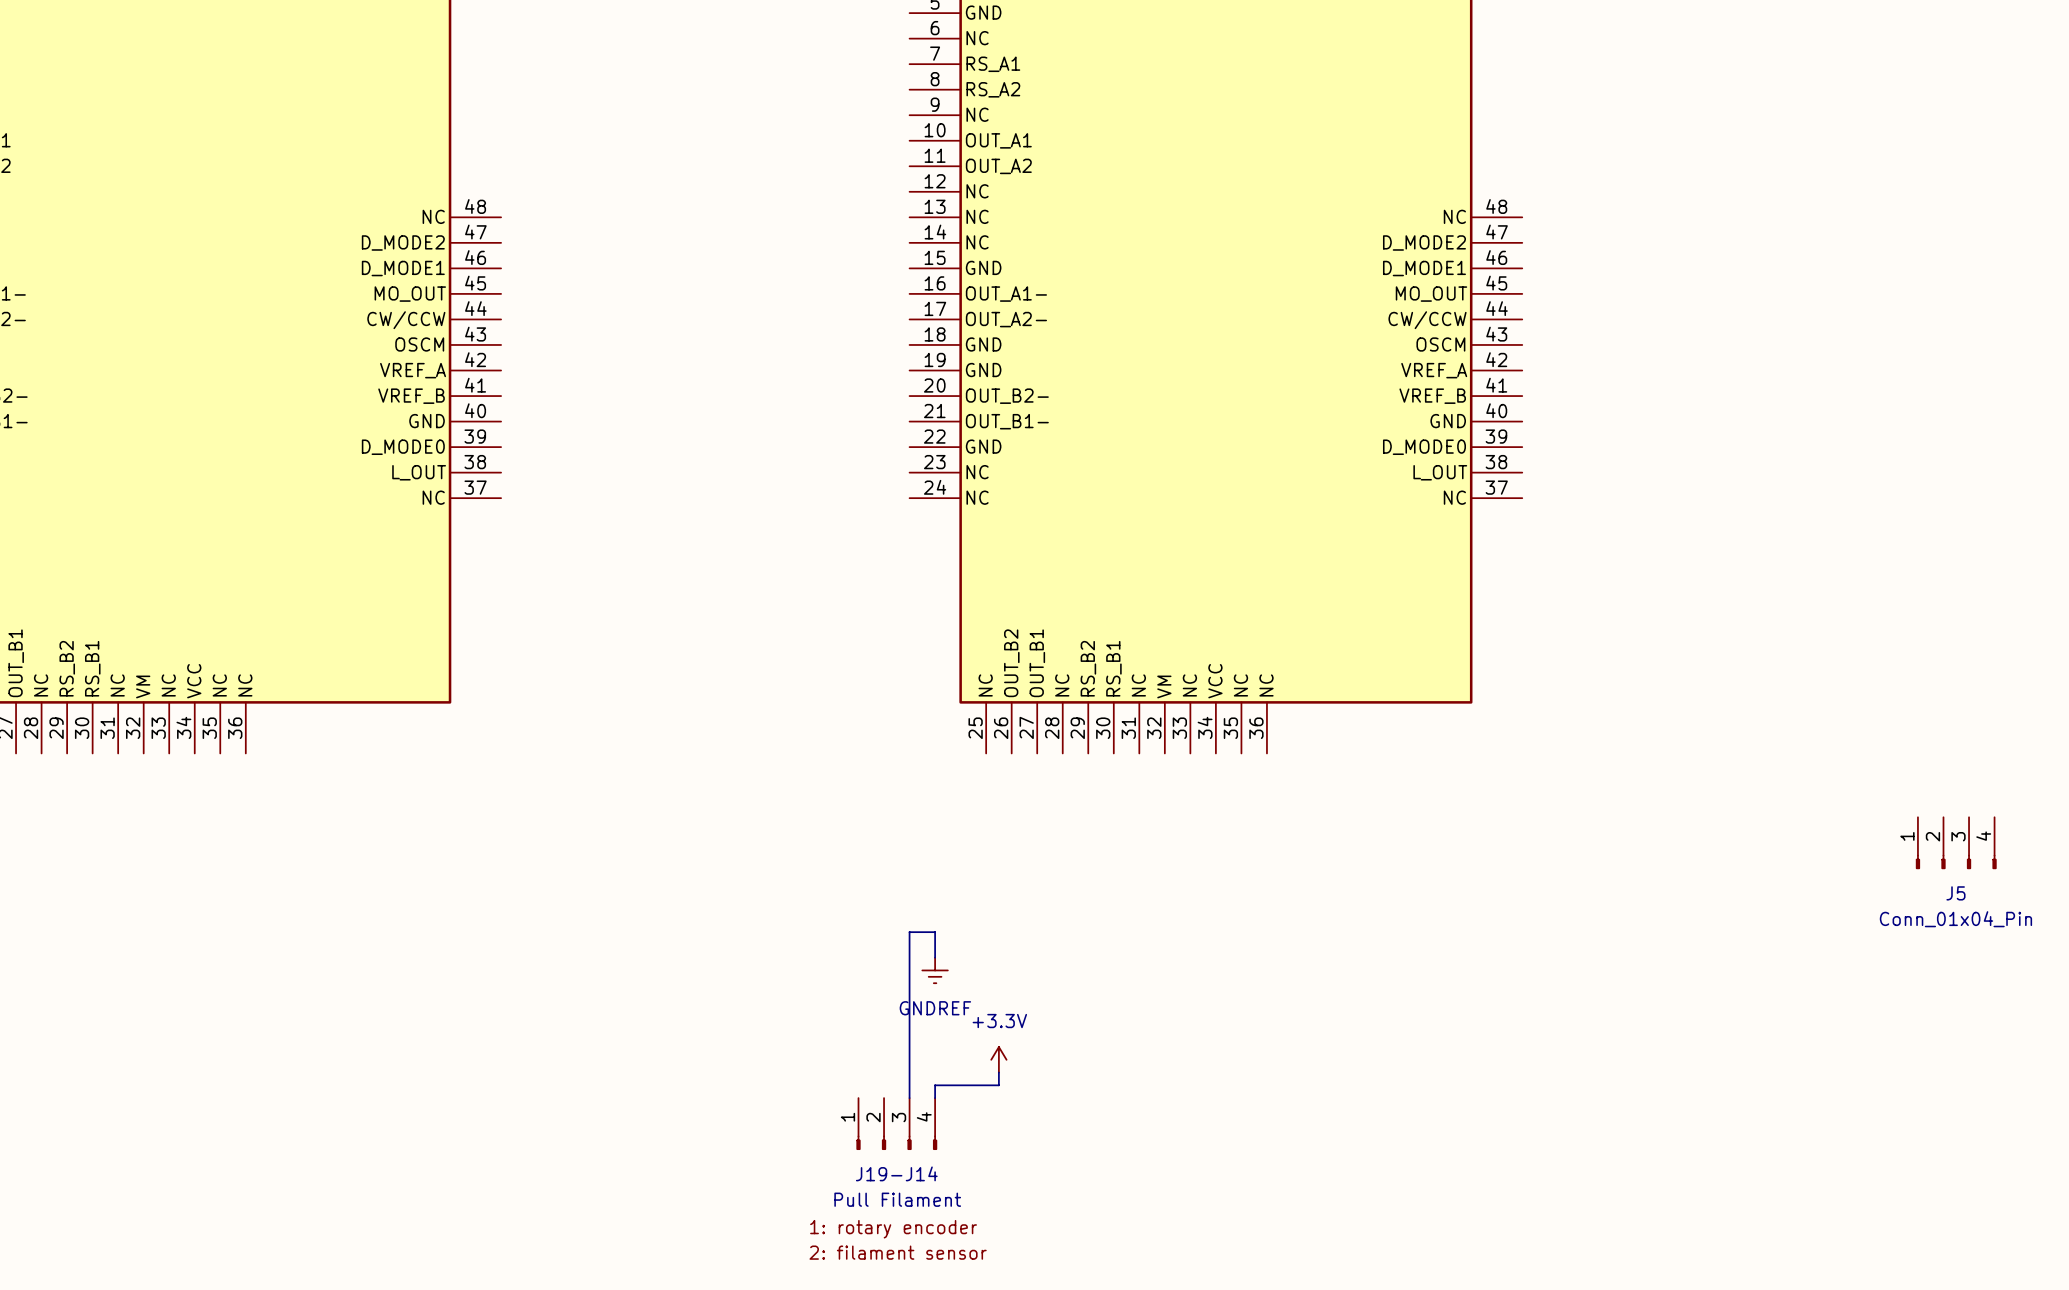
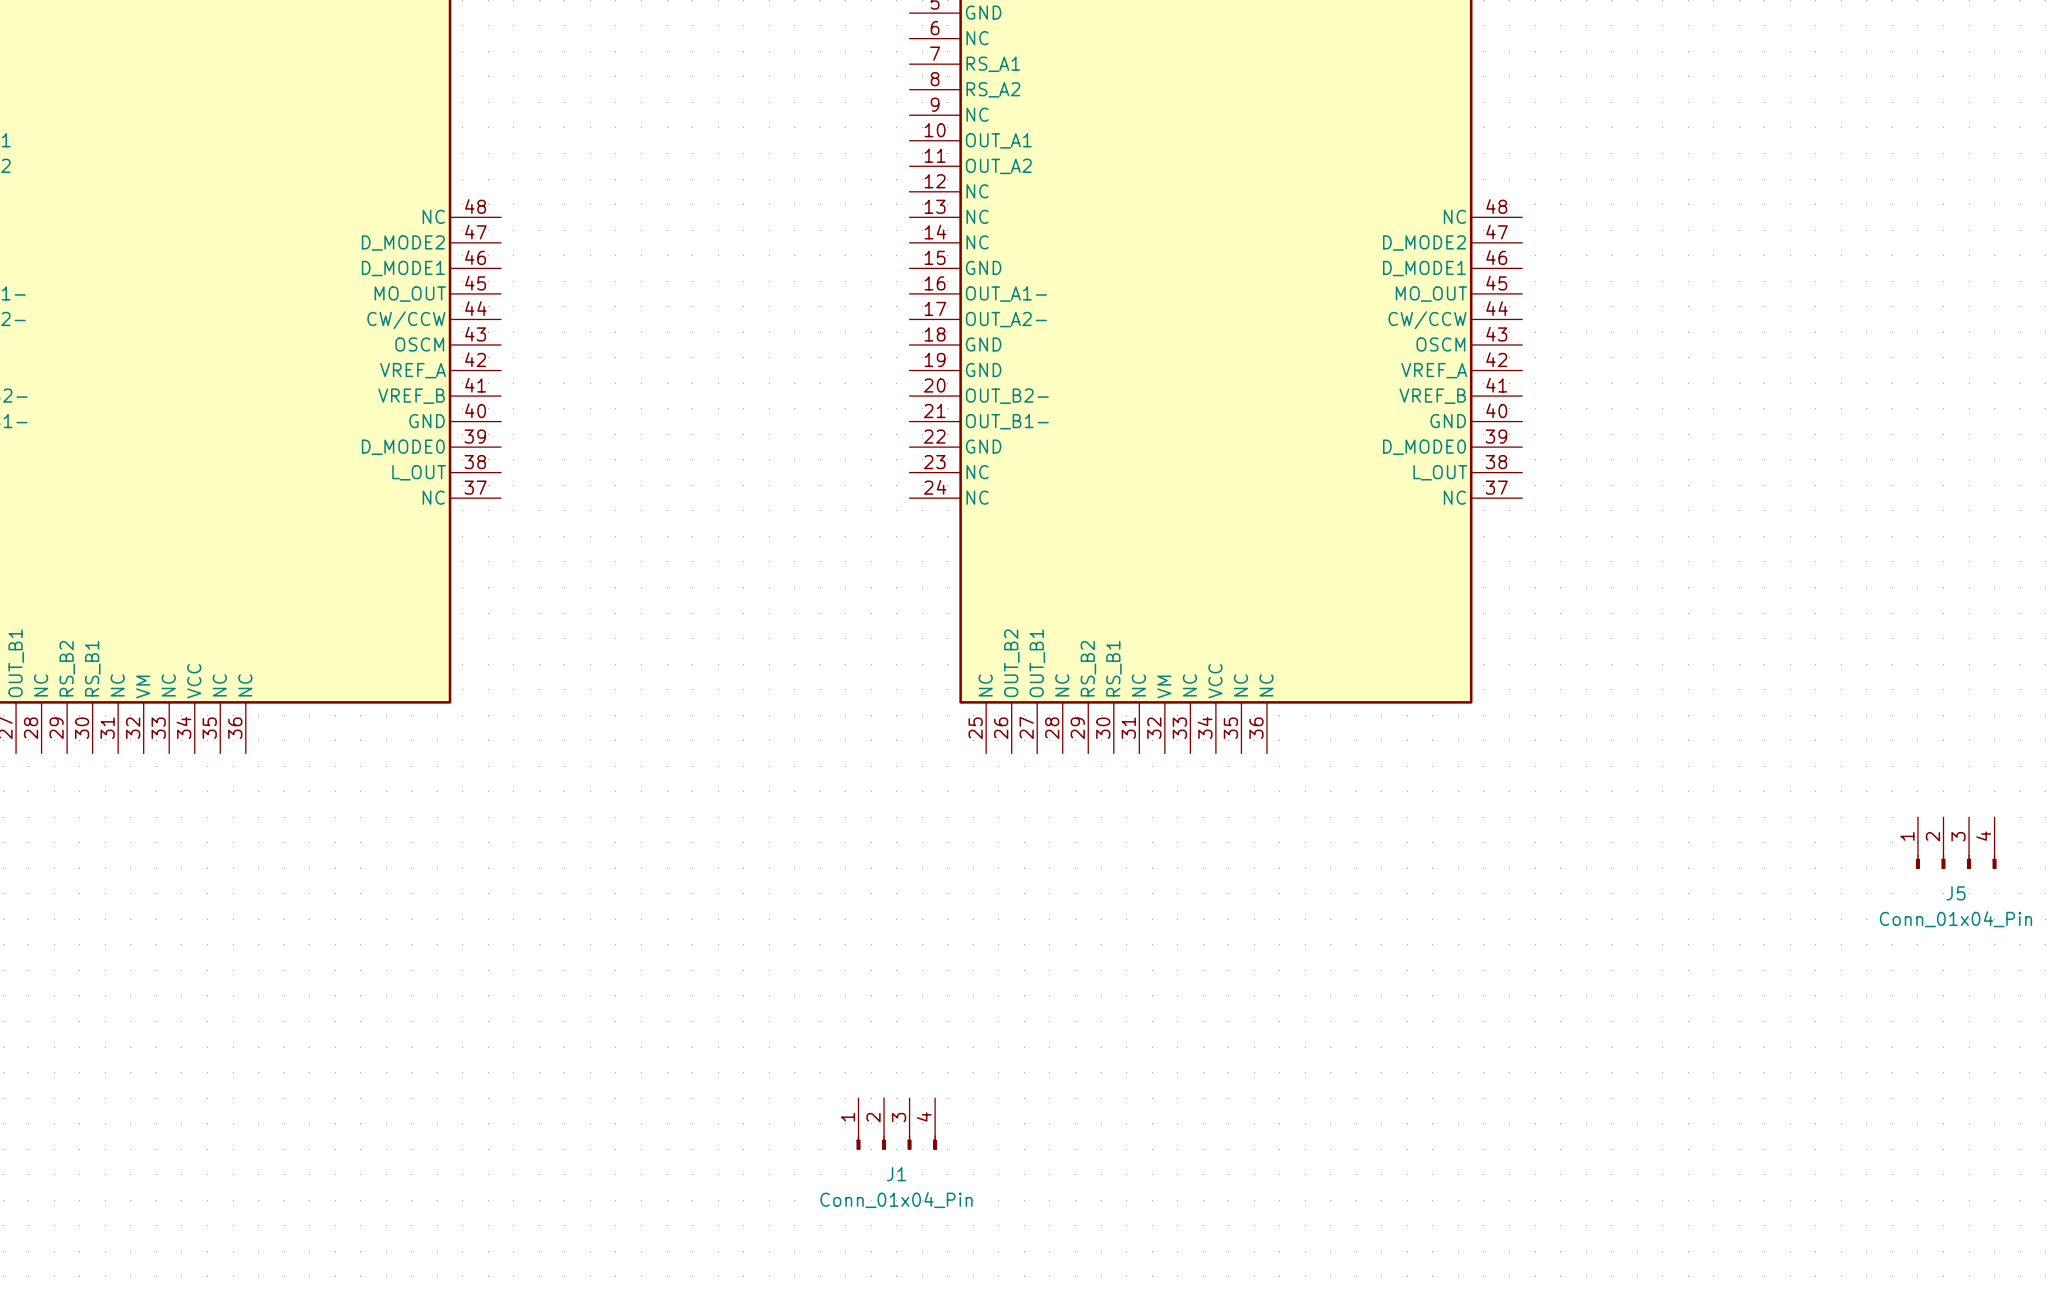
wire: (935, 957) (935, 932) (909, 932) (909, 1098) -> none
power symbol: GNDREF (935, 970) -> none
power symbol: +3.3V (998, 1059) -> none
wire: (998, 1072) (998, 1085) (935, 1085) (935, 1098) -> none
J19-J14 name: J19-J14 (896, 1173) -> J1 (896, 1174)
J19-J14 value: Pull Filament (897, 1199) -> Conn_01x04_Pin (896, 1200)
label: 1: rotary encoder (893, 1229) -> none
label: 2: filament sensor (898, 1252) -> none

